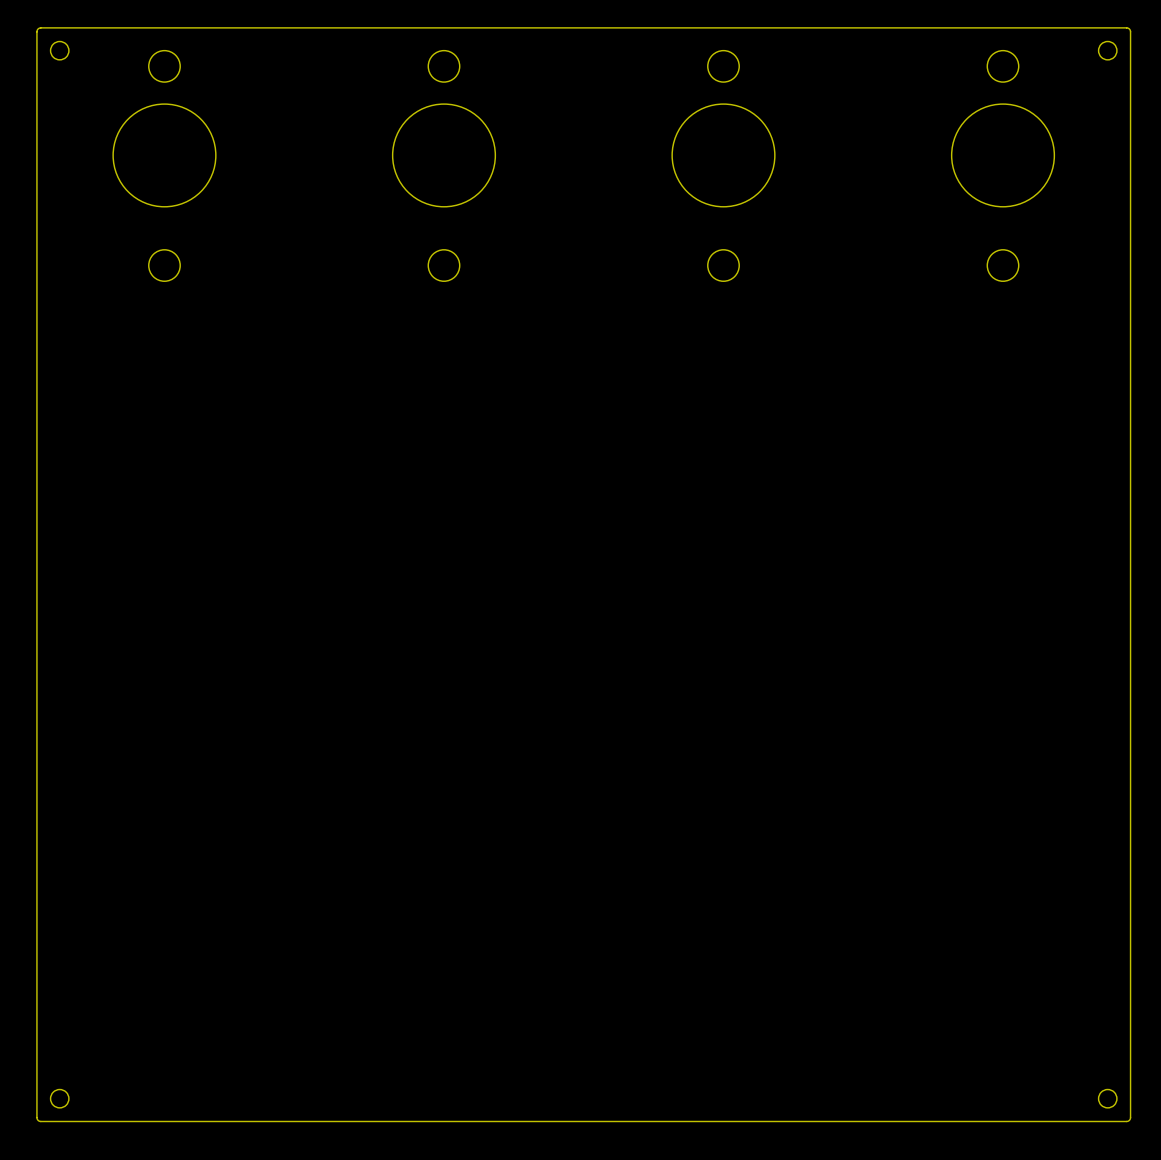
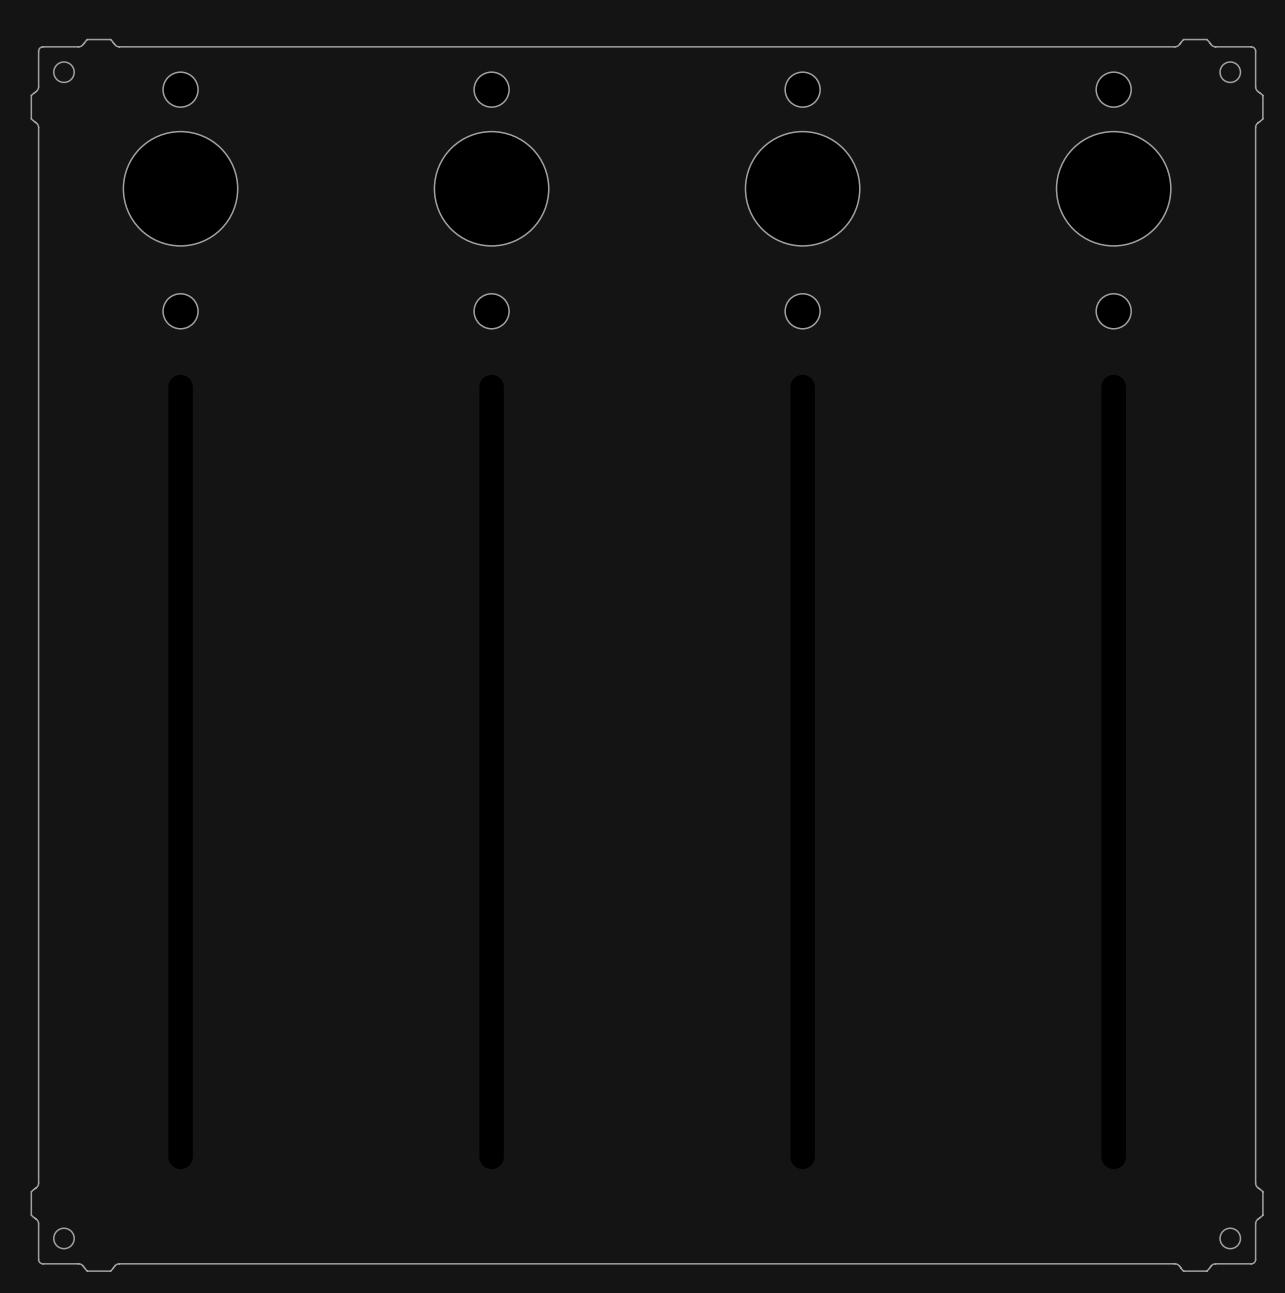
drawing shape: [36, 27, 1131, 1122] -> [31, 39, 1264, 1272]

